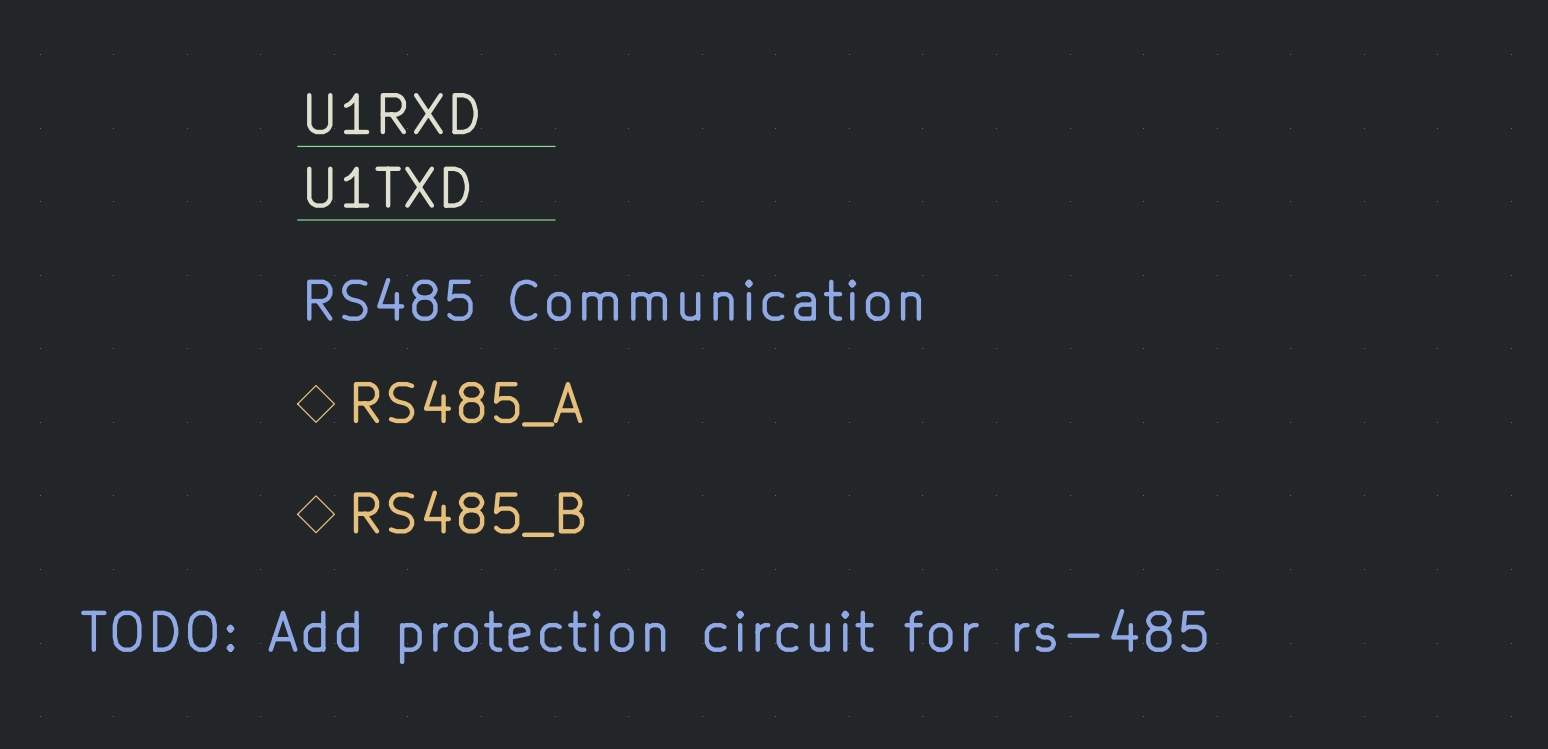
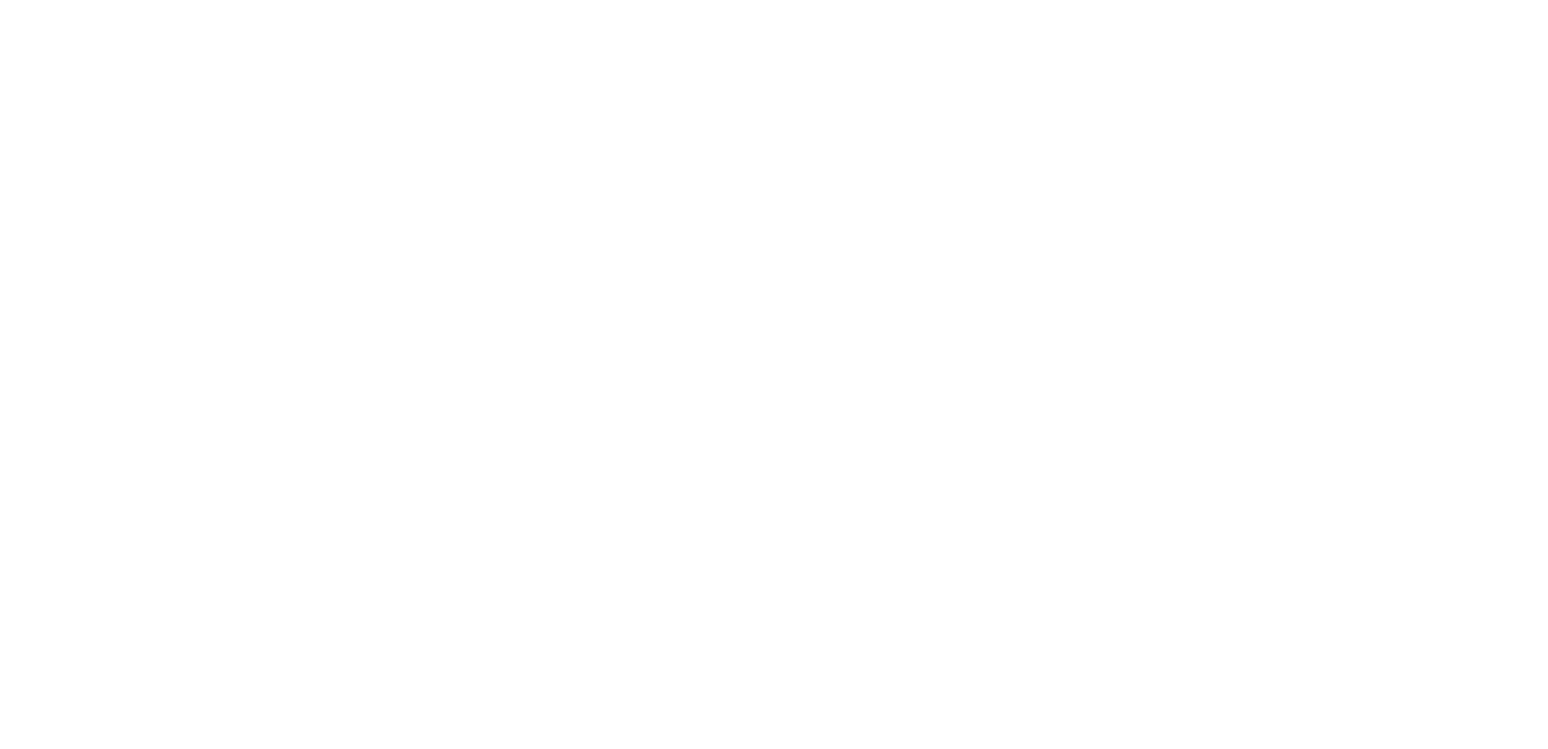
label: U1RXD (392, 113) -> none
wire: (297, 146) (555, 146) -> none
label: U1TXD (388, 187) -> none
wire: (297, 220) (555, 220) -> none
text: RS485 Communication (614, 299) -> none
hierarchical label: RS485_A (468, 403) -> none
hierarchical label: RS485_B (468, 513) -> none
text: TODO: Add protection circuit for rs-485 (643, 636) -> none

